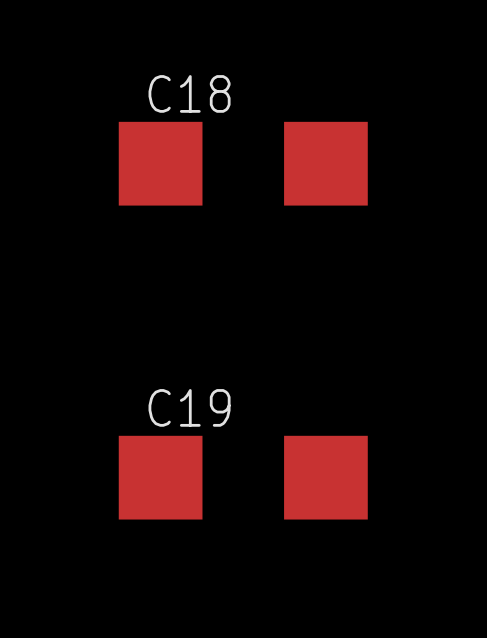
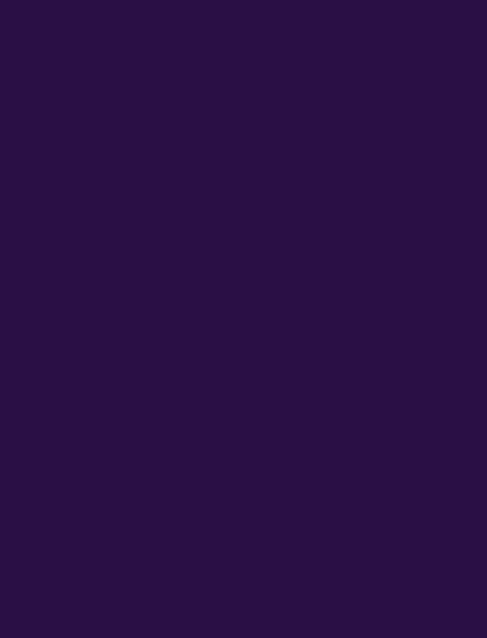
C18: (243, 163) -> none
C19: (243, 477) -> none

